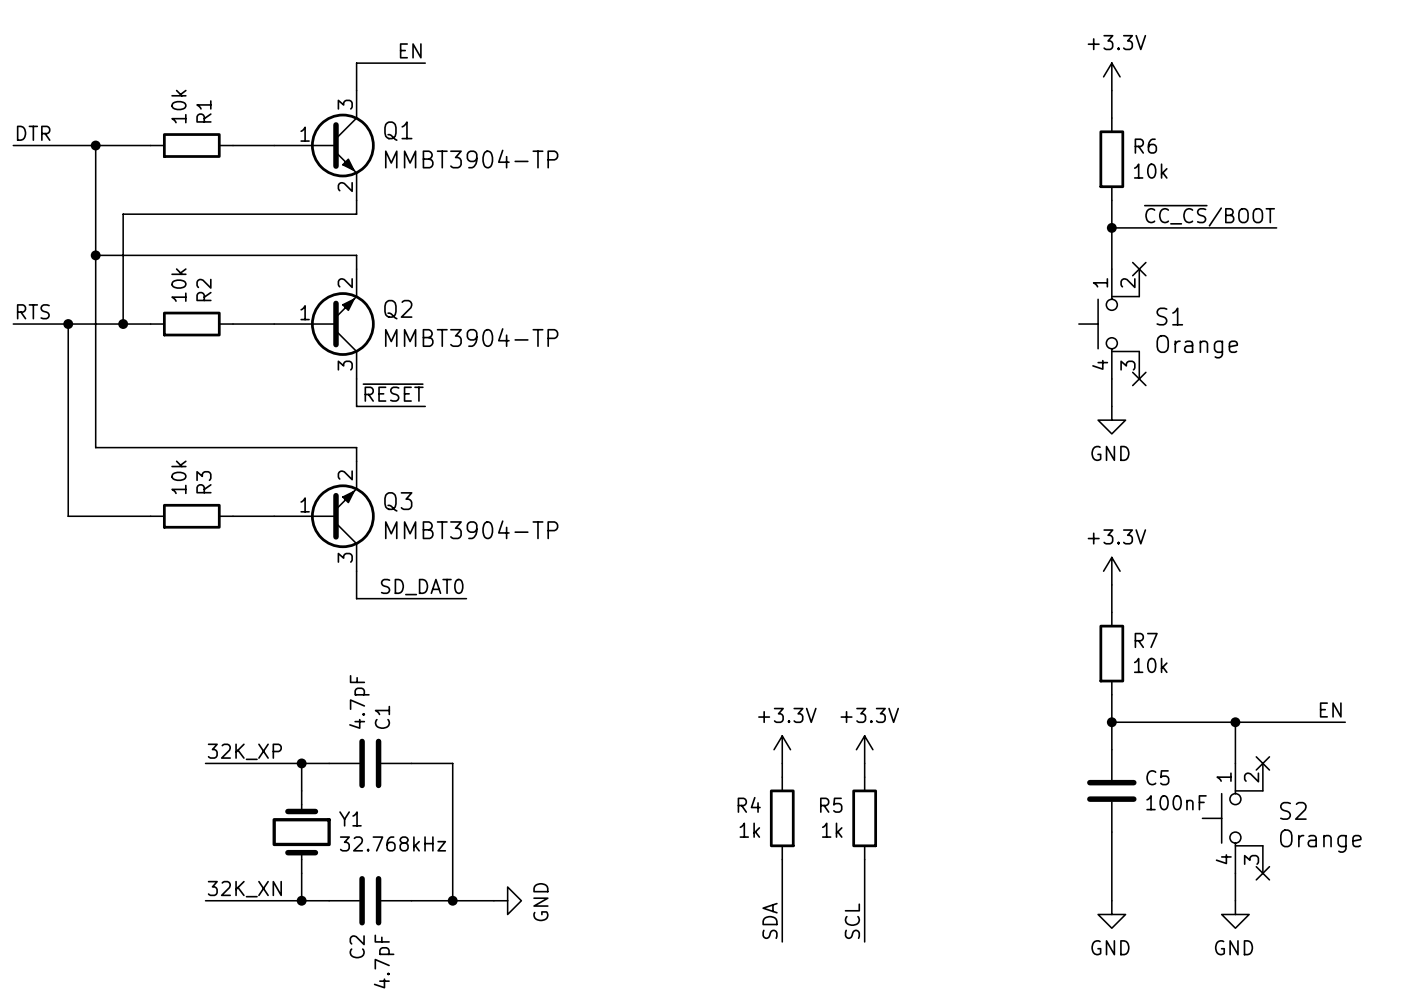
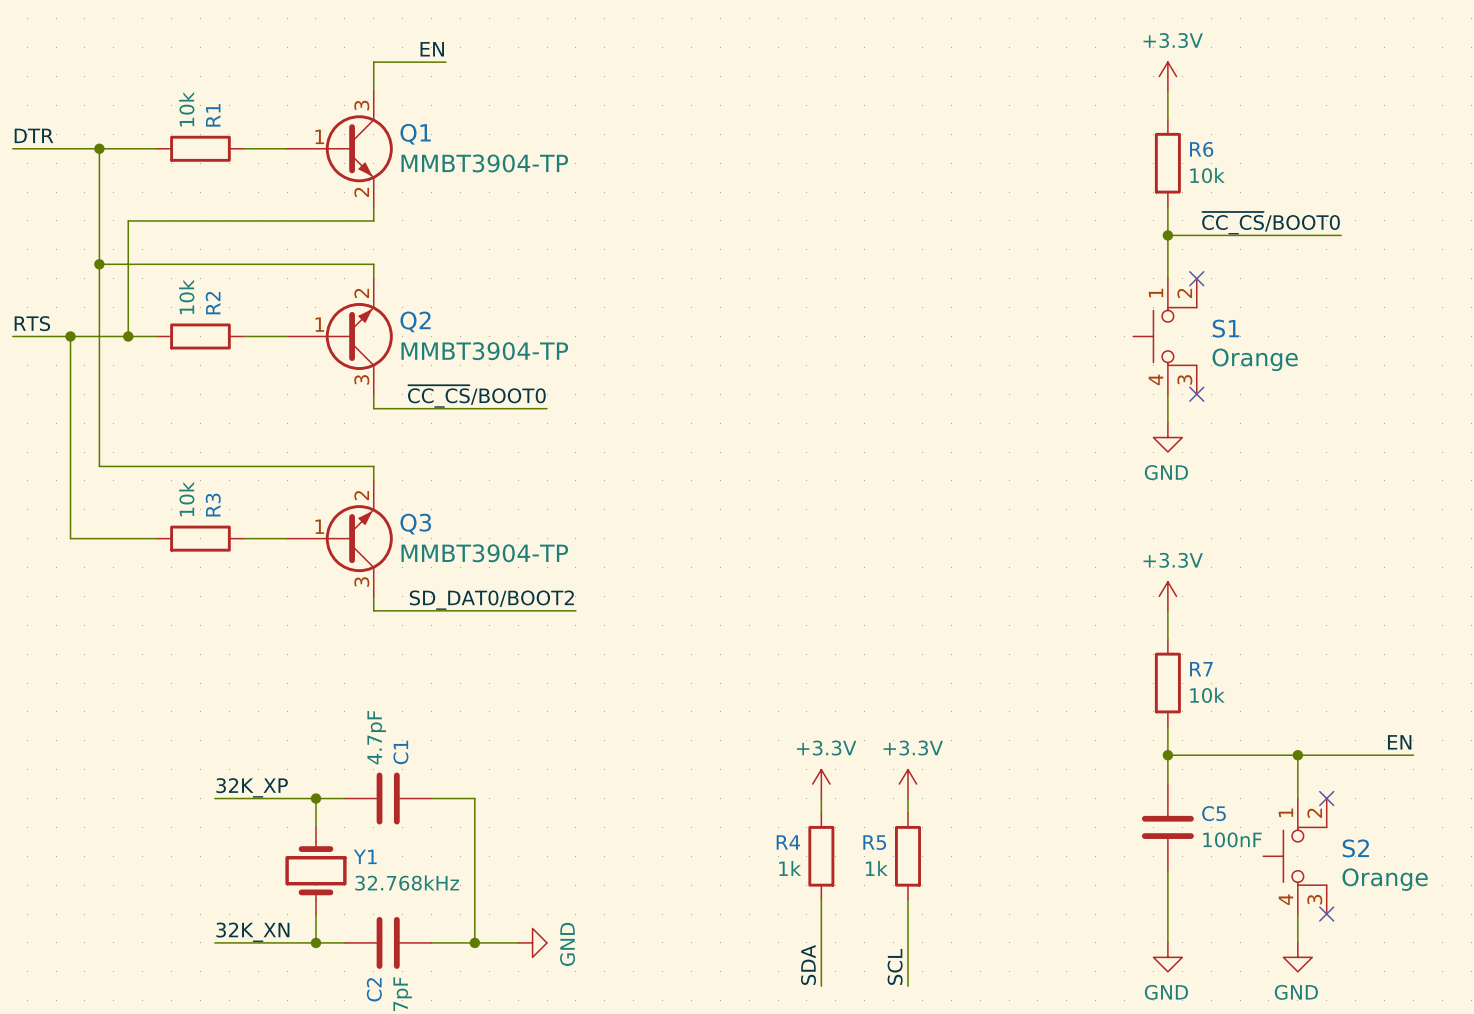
label: ~{CC_CS}/BOOT (1209, 215) -> ~{CC_CS}/BOOT0 (1271, 223)
label: none -> ~{CC_CS}/BOOT0 (476, 396)
wire: (356, 392) (356, 406) (425, 406) -> (373, 408) (547, 408)
label: ~{RESET} (393, 392) -> none
wire: (356, 584) (356, 598) (466, 598) -> (373, 610) (575, 610)
label: SD_DAT0 (422, 587) -> SD_DAT0/BOOT2 (491, 600)

